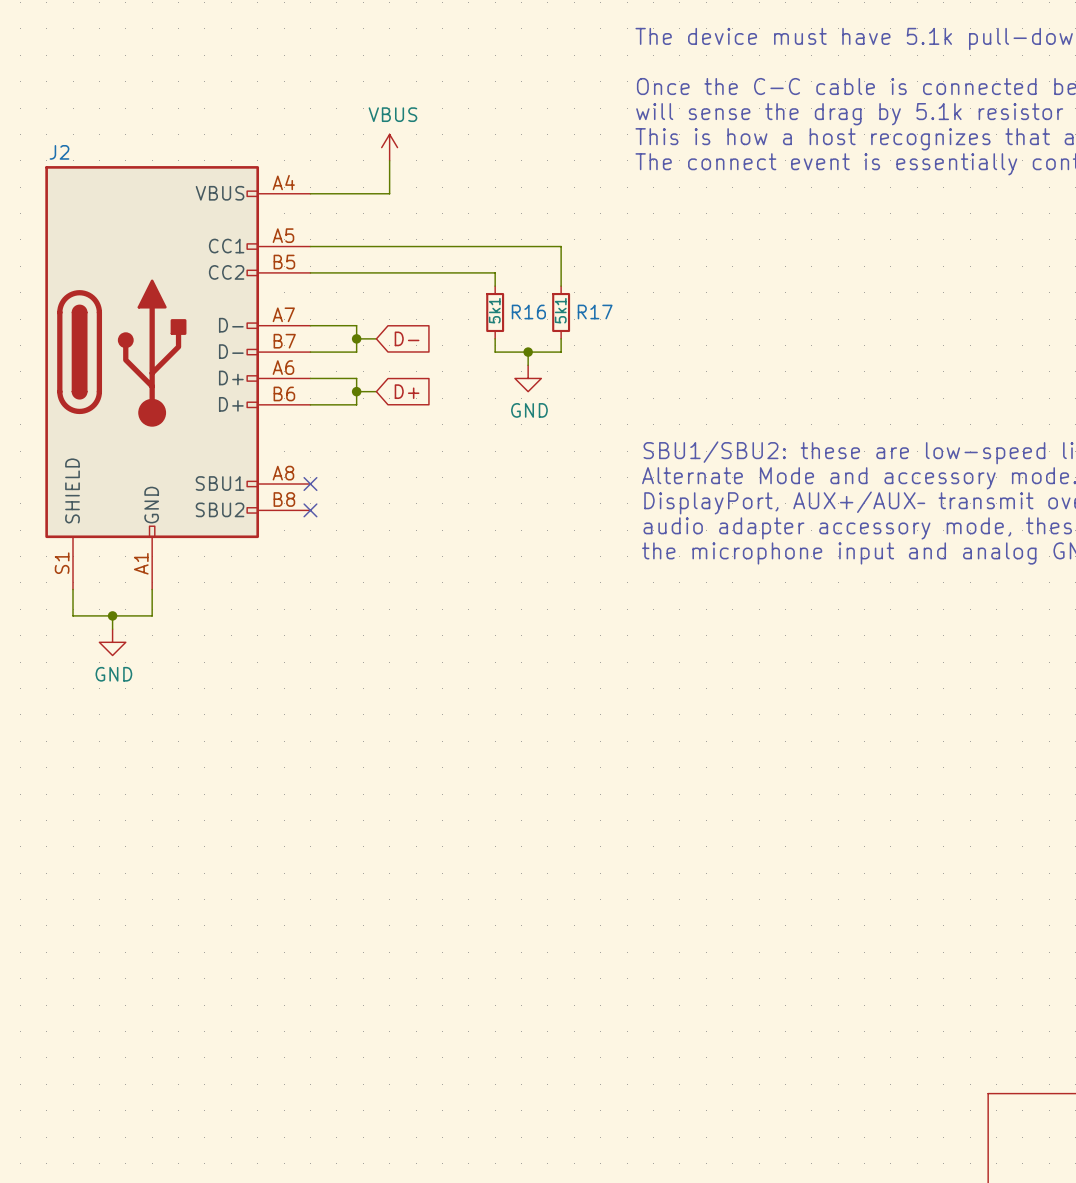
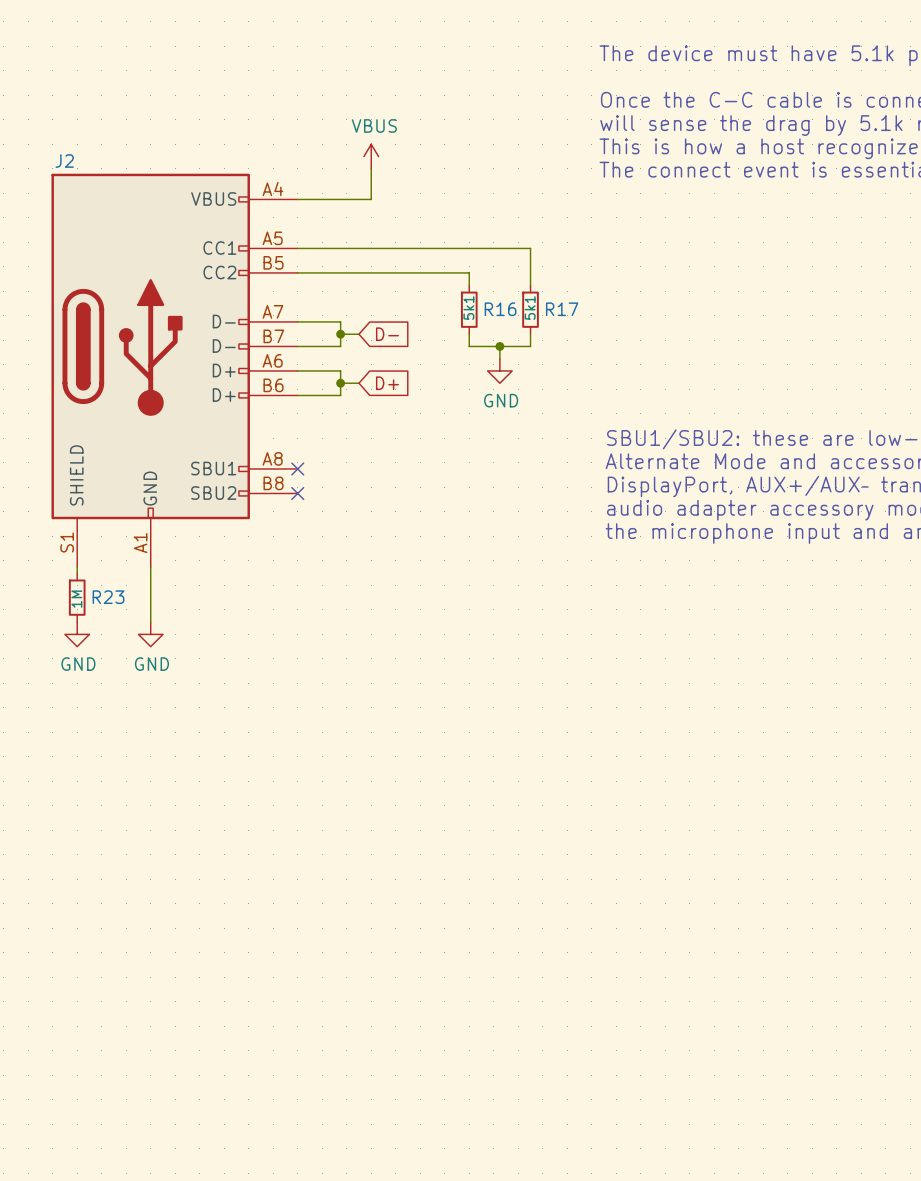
wire: (73, 596) (73, 615) (152, 615) -> (150, 622) (150, 591)
wire: (112, 615) (112, 629) -> none
junction: (112, 615) -> none
R23: none -> 1M (77, 597)
power symbol: GND (112, 642) -> none
power symbol: none -> GND (77, 634)
power symbol: none -> GND (150, 634)

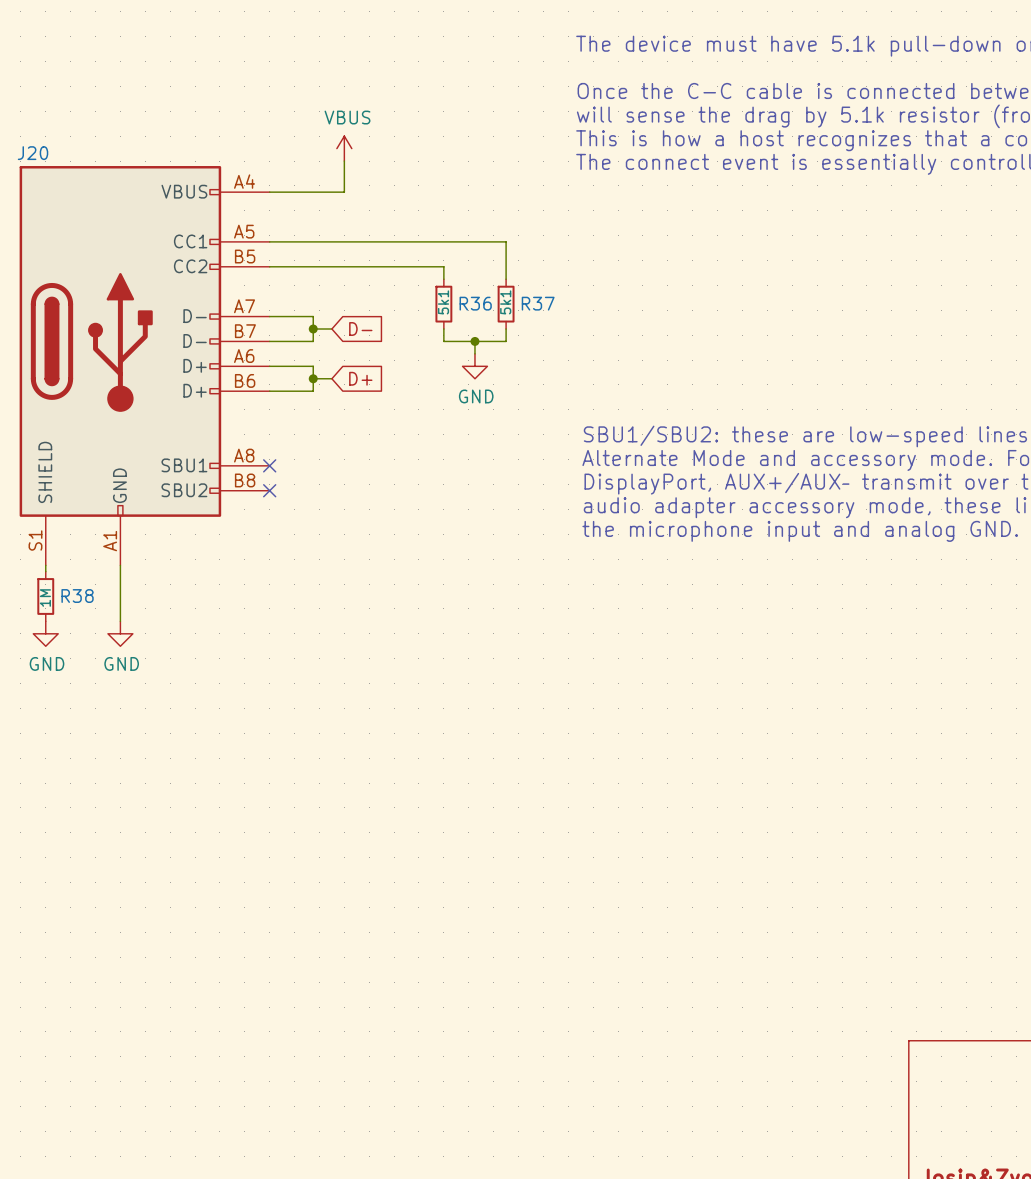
J2 name: J2 (64, 161) -> J20 (33, 153)
R16 name: R16 (500, 309) -> R36 (475, 303)
R17 name: R17 (562, 309) -> R37 (538, 303)
R23 name: R23 (108, 597) -> R38 (77, 596)

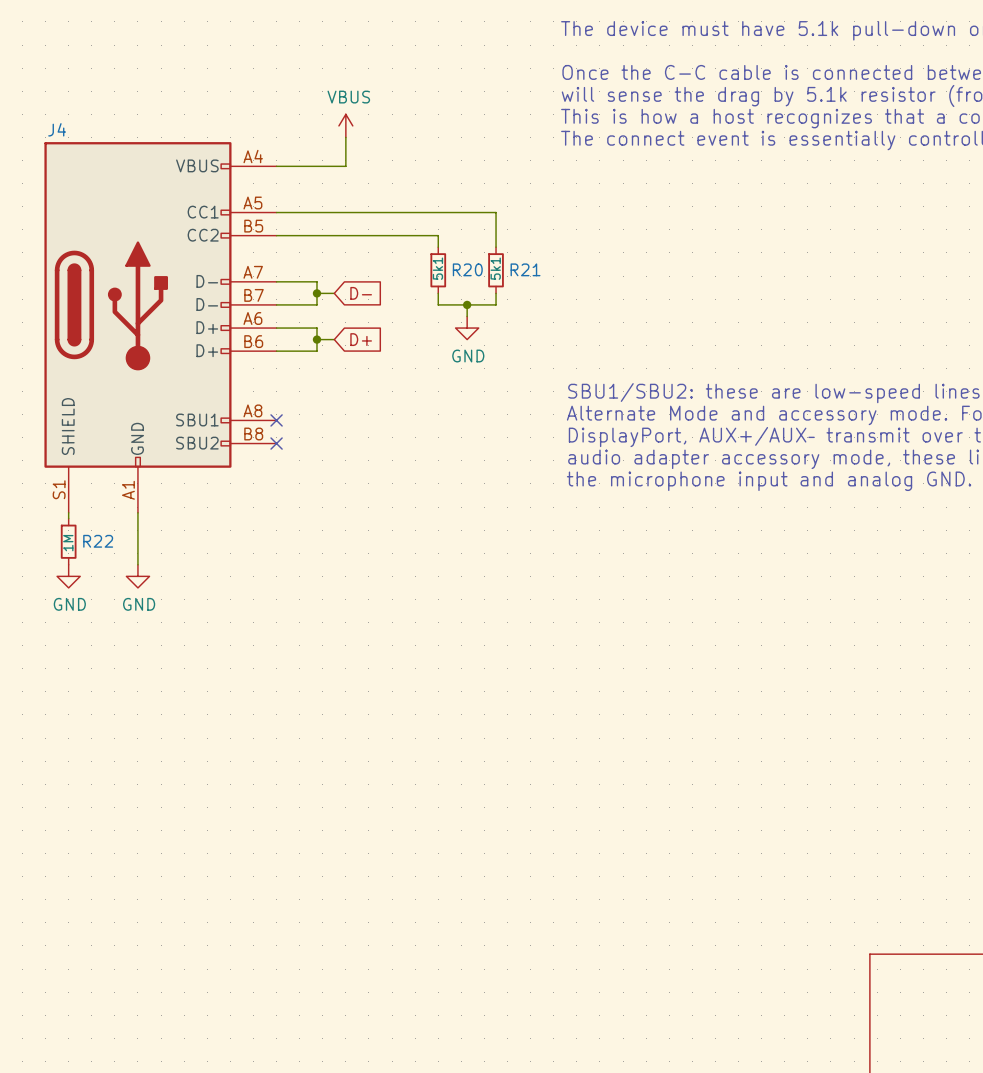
J20 name: J20 (33, 153) -> J4 (57, 129)
R36 name: R36 (475, 303) -> R20 (467, 269)
R37 name: R37 (538, 303) -> R21 (525, 269)
R38 name: R38 (77, 596) -> R22 (98, 541)

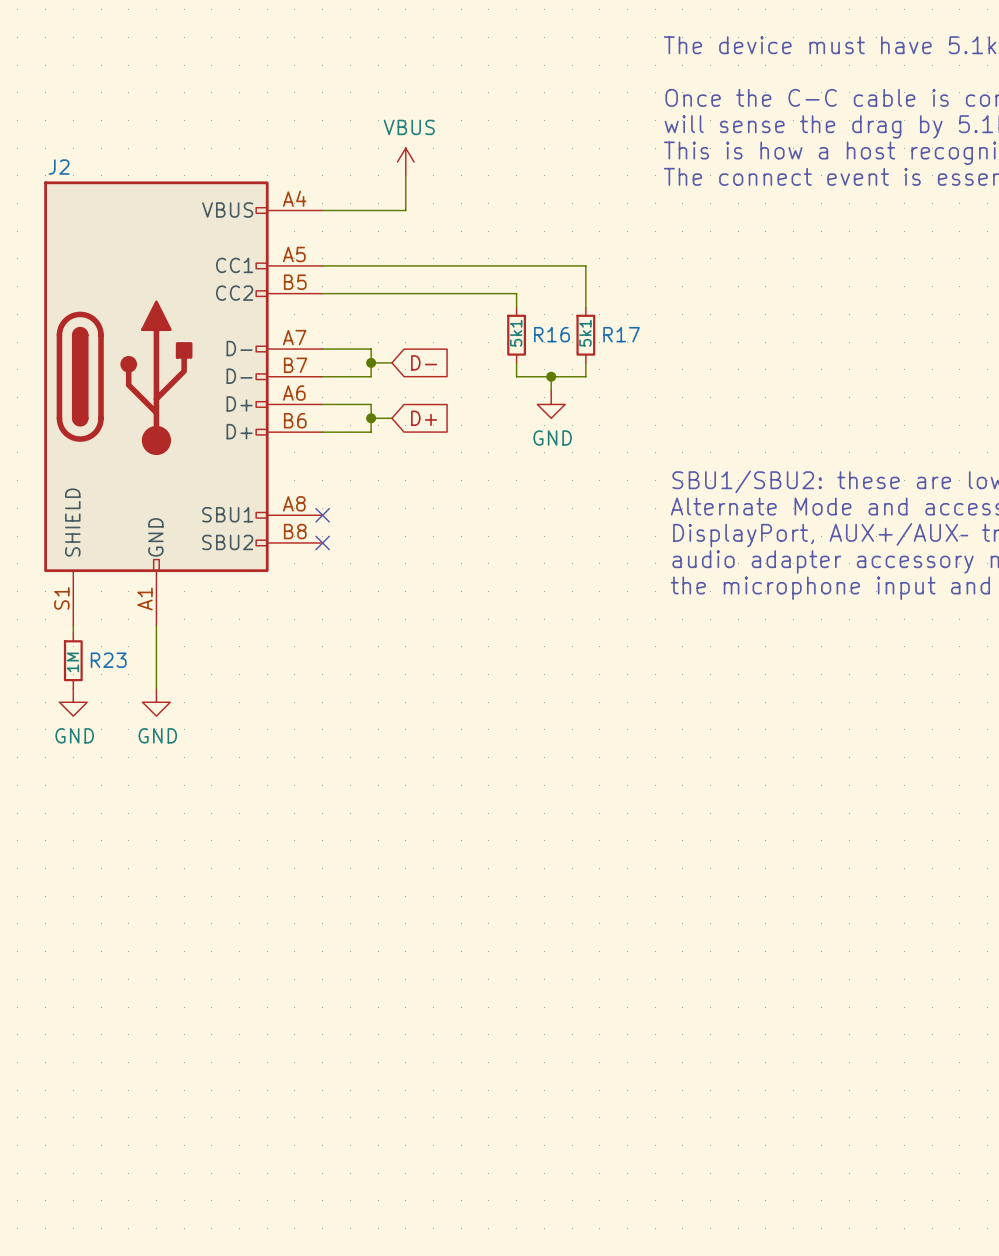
J4 name: J4 (57, 129) -> J2 (59, 167)
R20 name: R20 (467, 269) -> R16 (551, 334)
R21 name: R21 (525, 269) -> R17 (621, 334)
R22 name: R22 (98, 541) -> R23 (108, 660)

